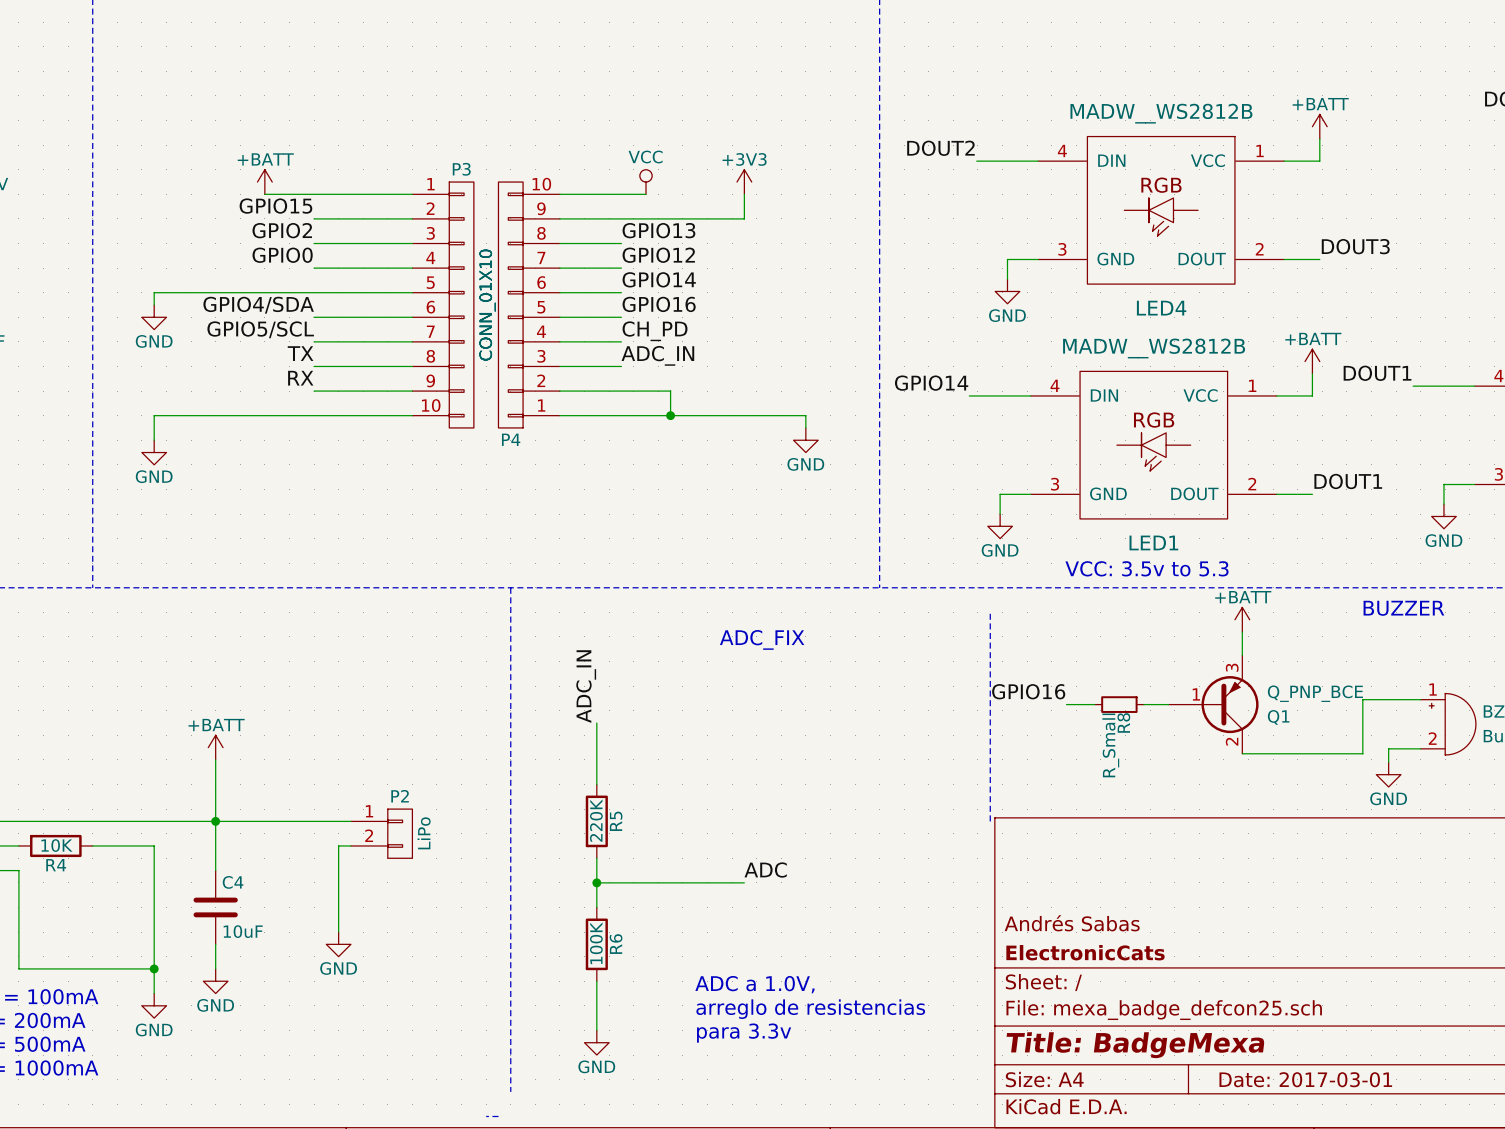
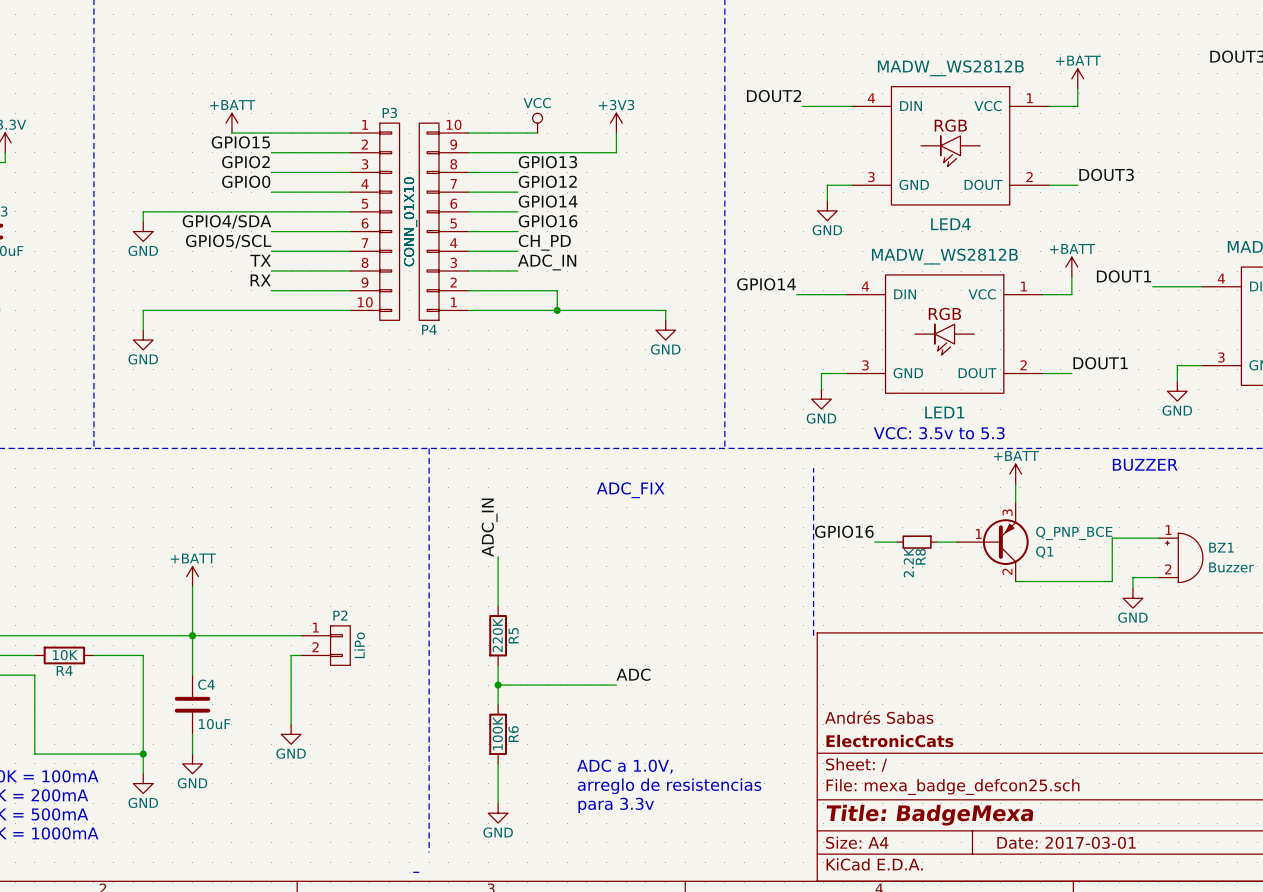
R8 value: R_Small (1110, 745) -> 2.2K (908, 562)

